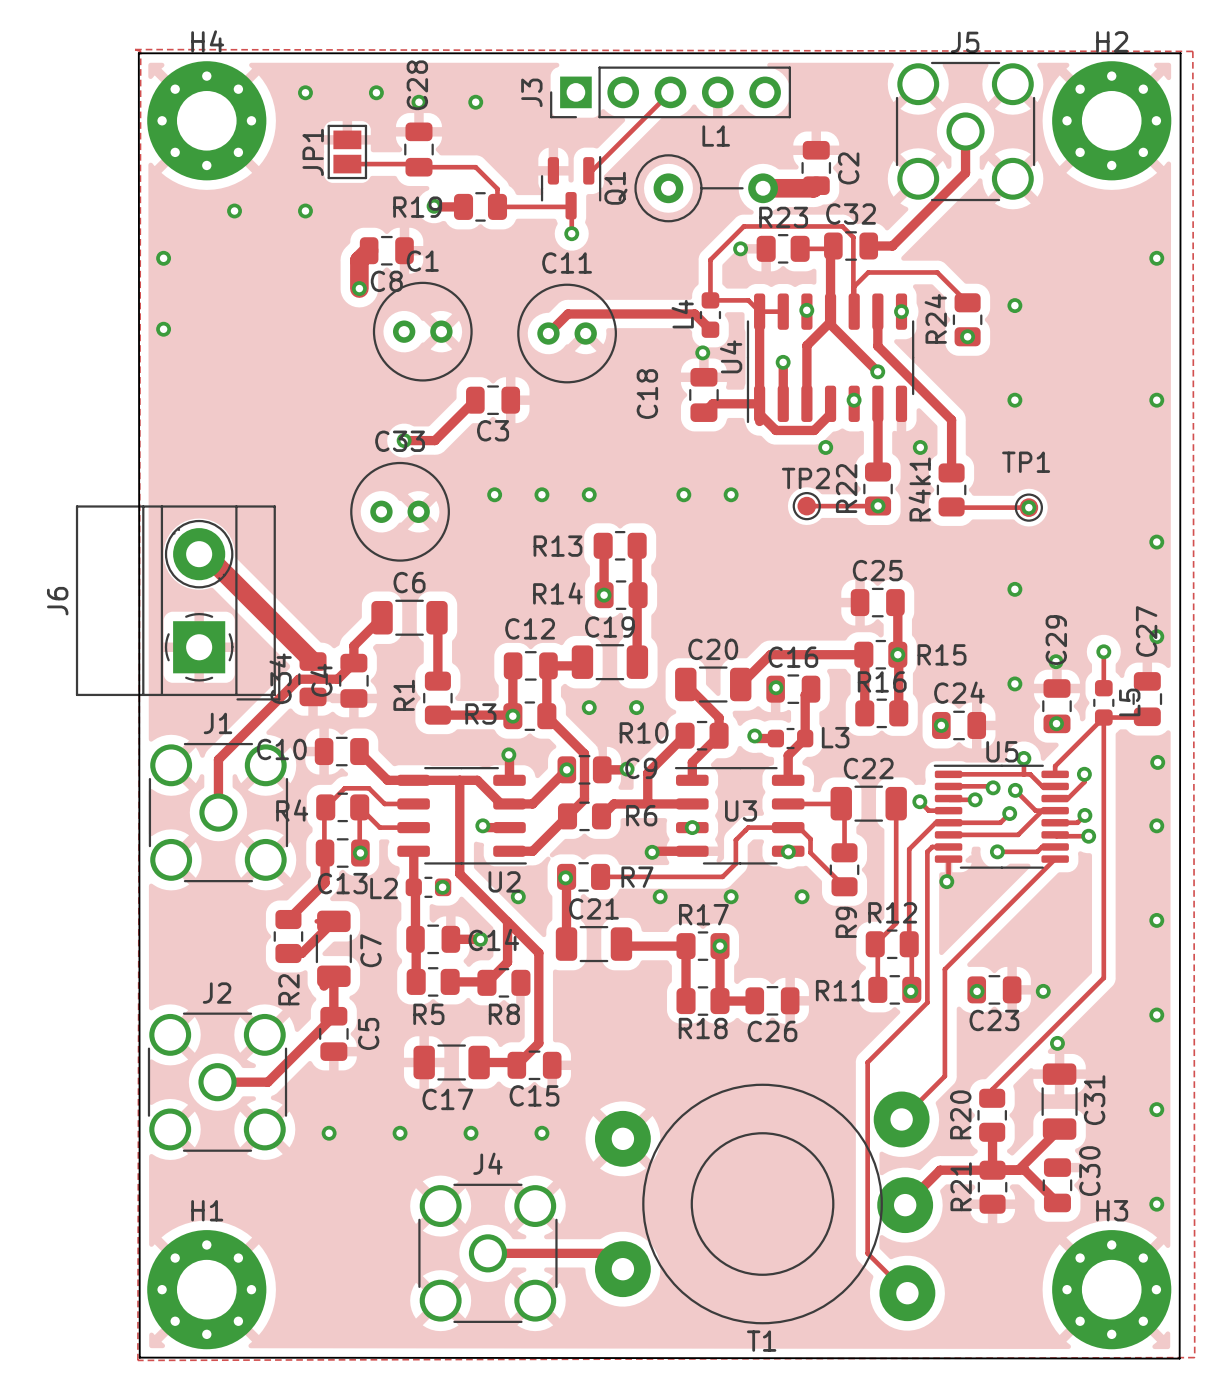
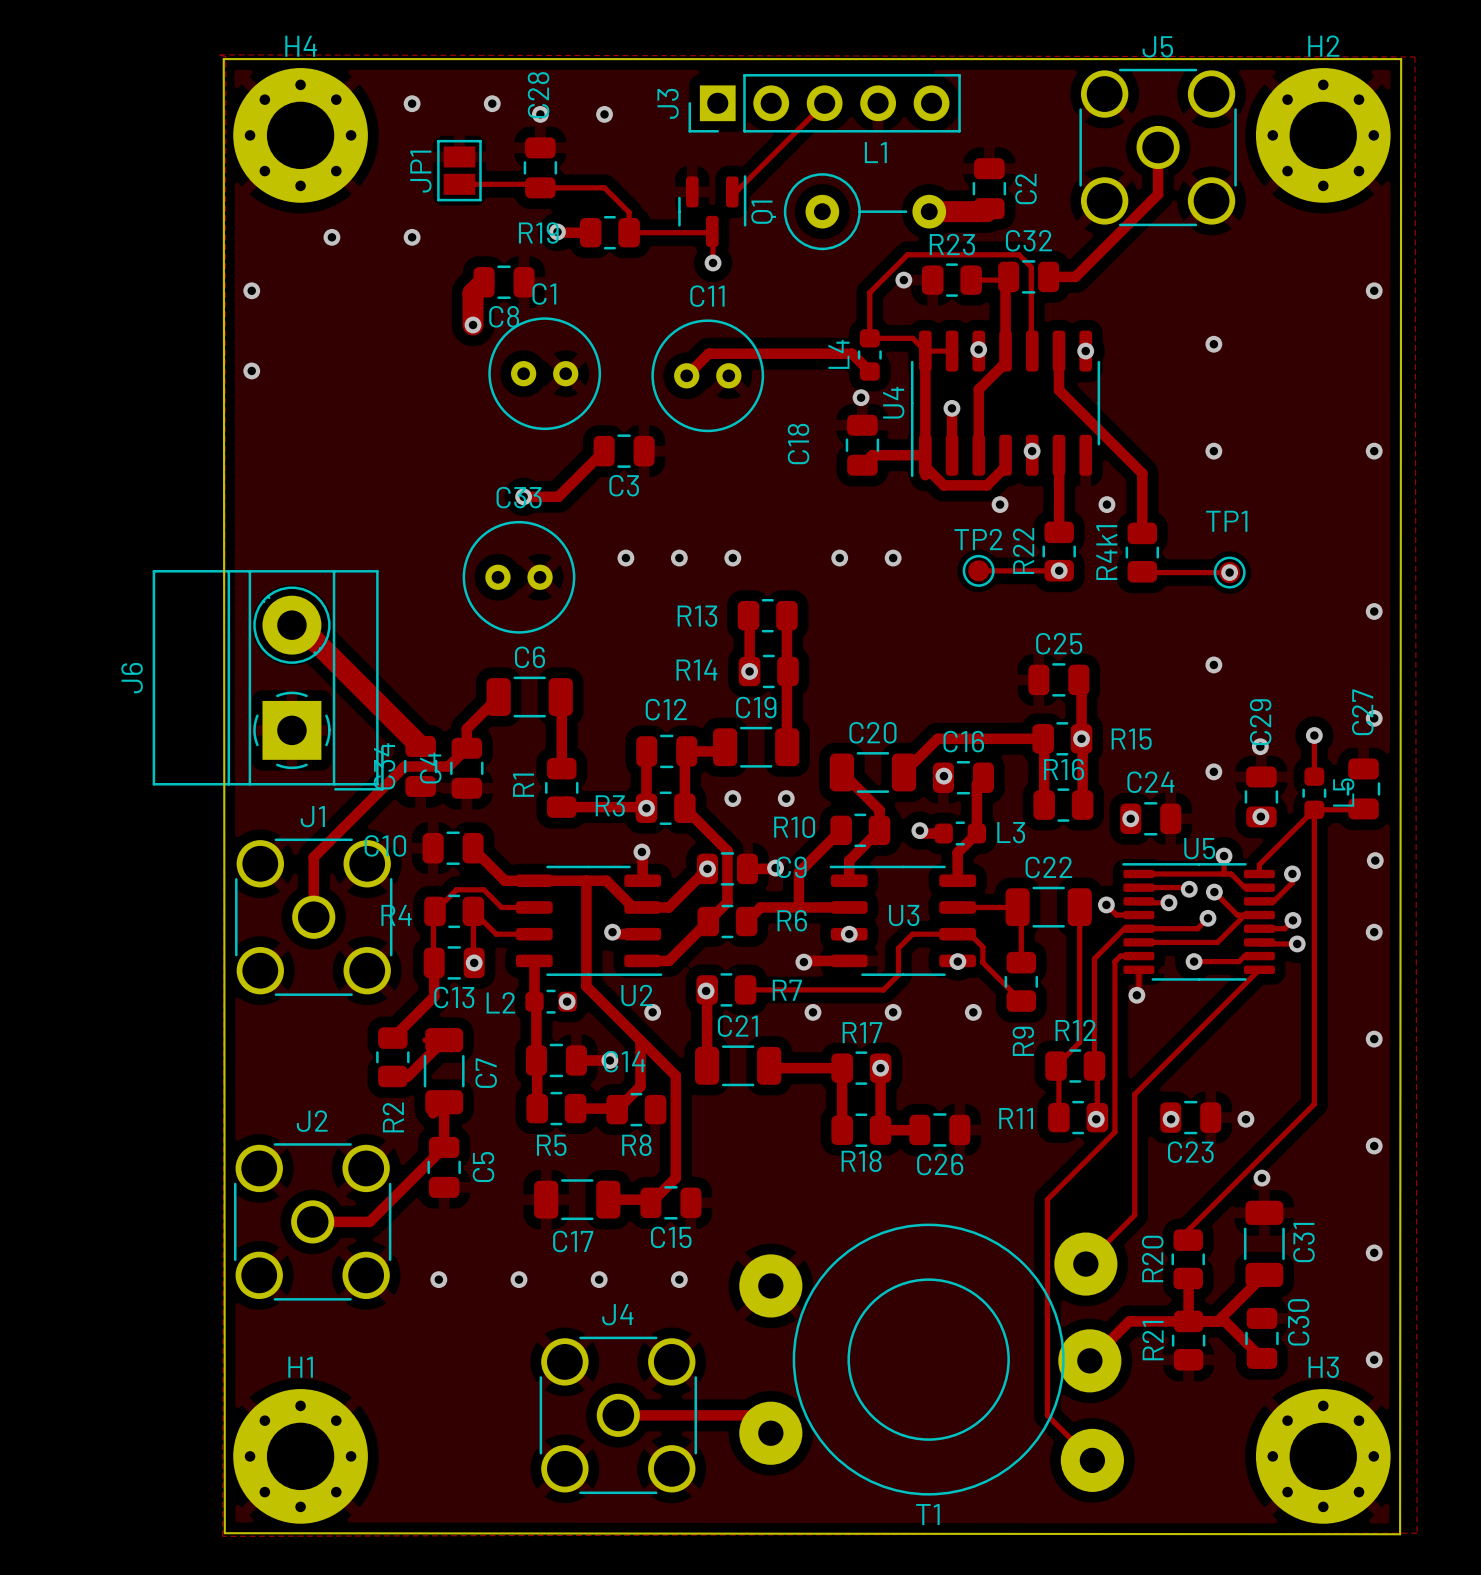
track: (967, 302) (937, 272) (868, 272) (854, 286) (854, 311) -> none
R24: (967, 319) -> none
track: (830, 321) (830, 324) (877, 371) -> none
via: (967, 336) -> none
via: (877, 371) -> none

